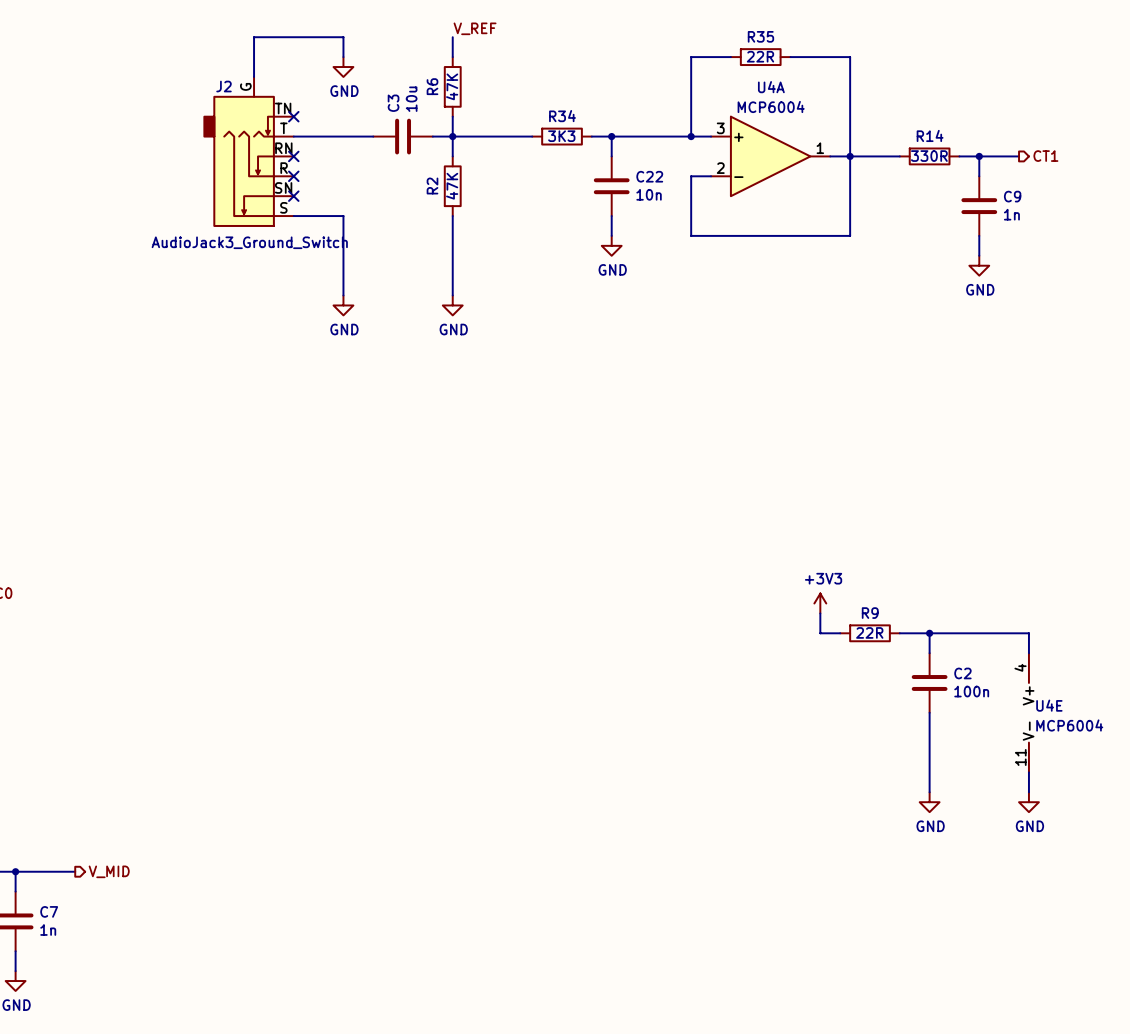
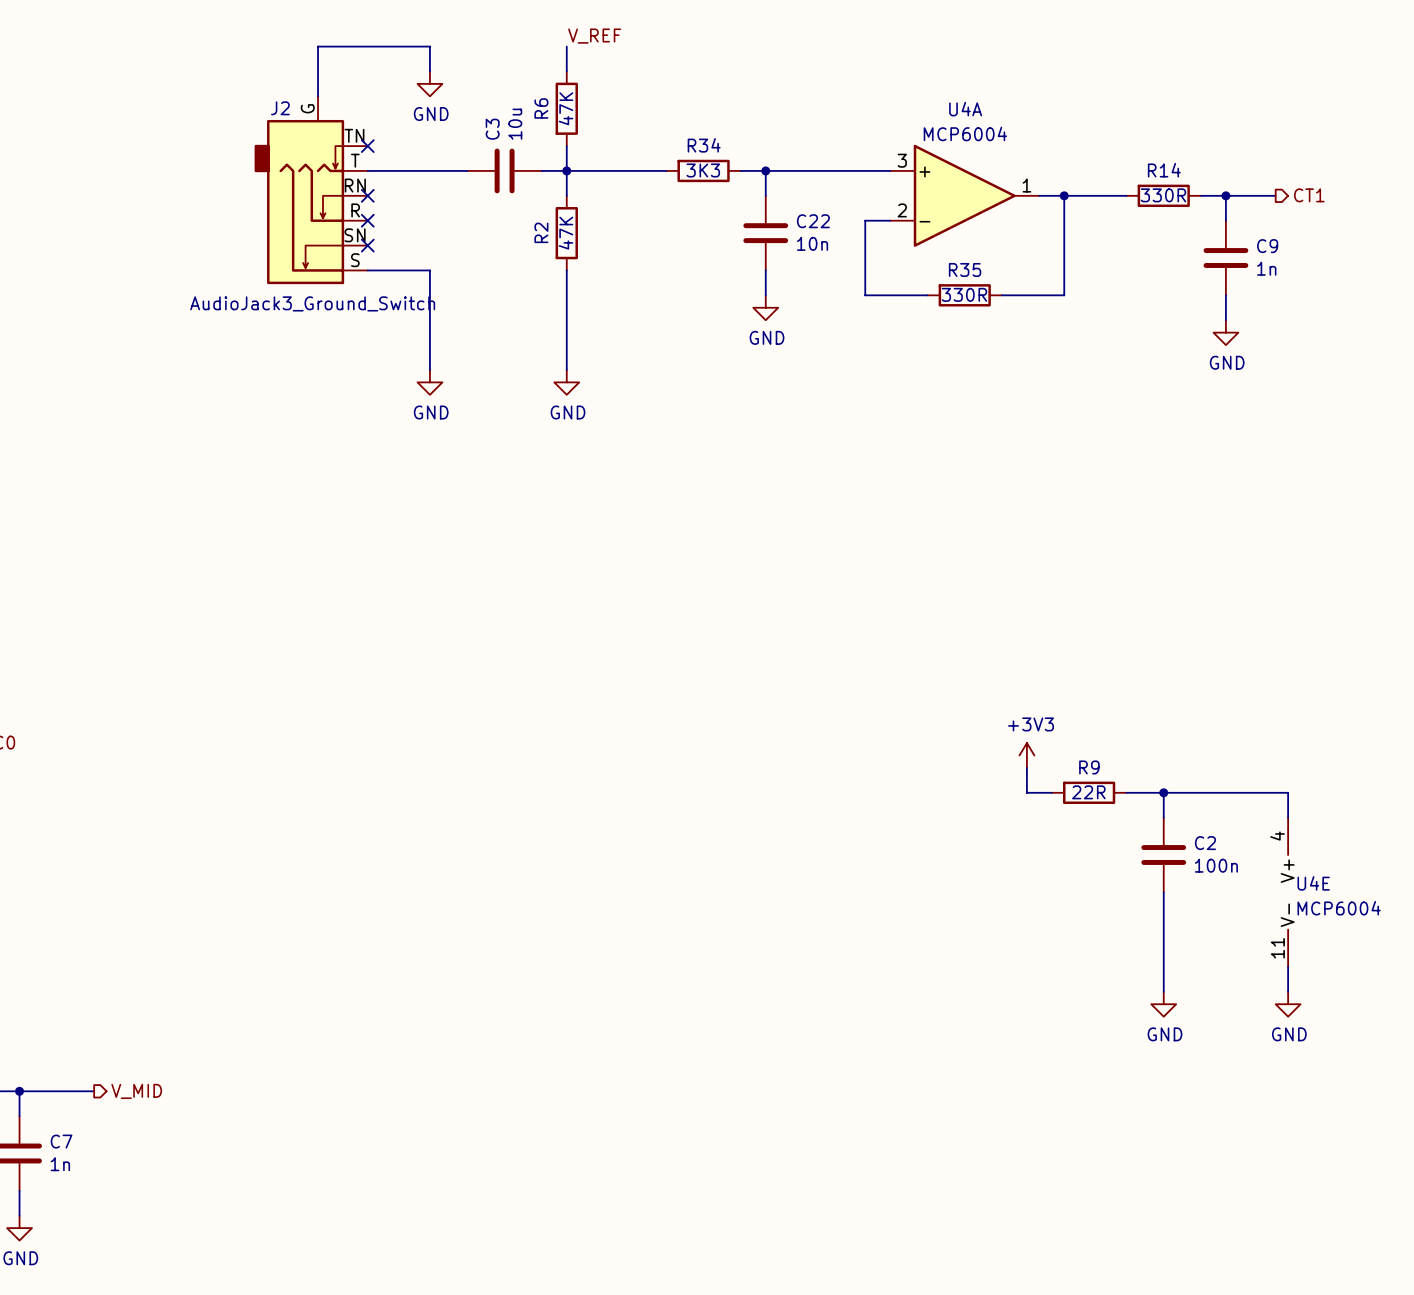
R35 value: 22R (760, 56) -> 330R (964, 294)
wire: (730, 57) (691, 57) (691, 136) -> none
R35 position: (760, 57) -> (964, 295)
wire: (790, 57) (850, 57) (850, 156) -> none
junction: (691, 136) -> none

